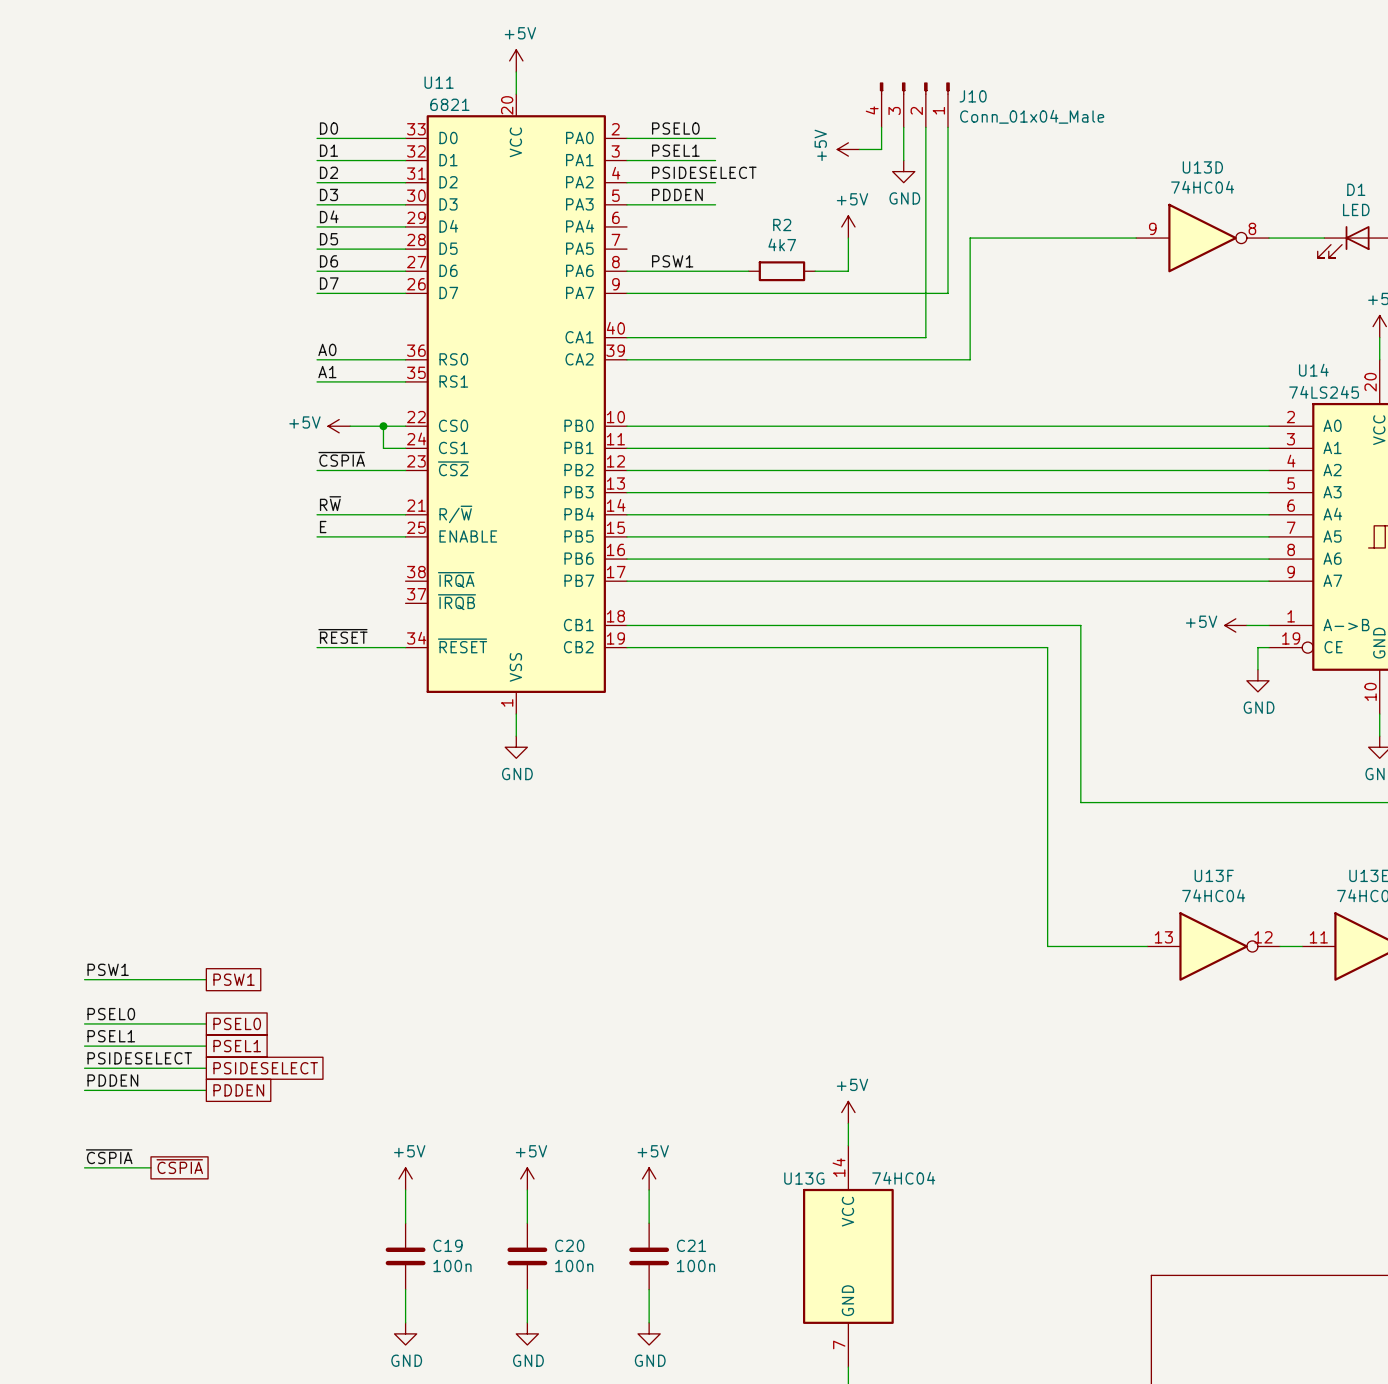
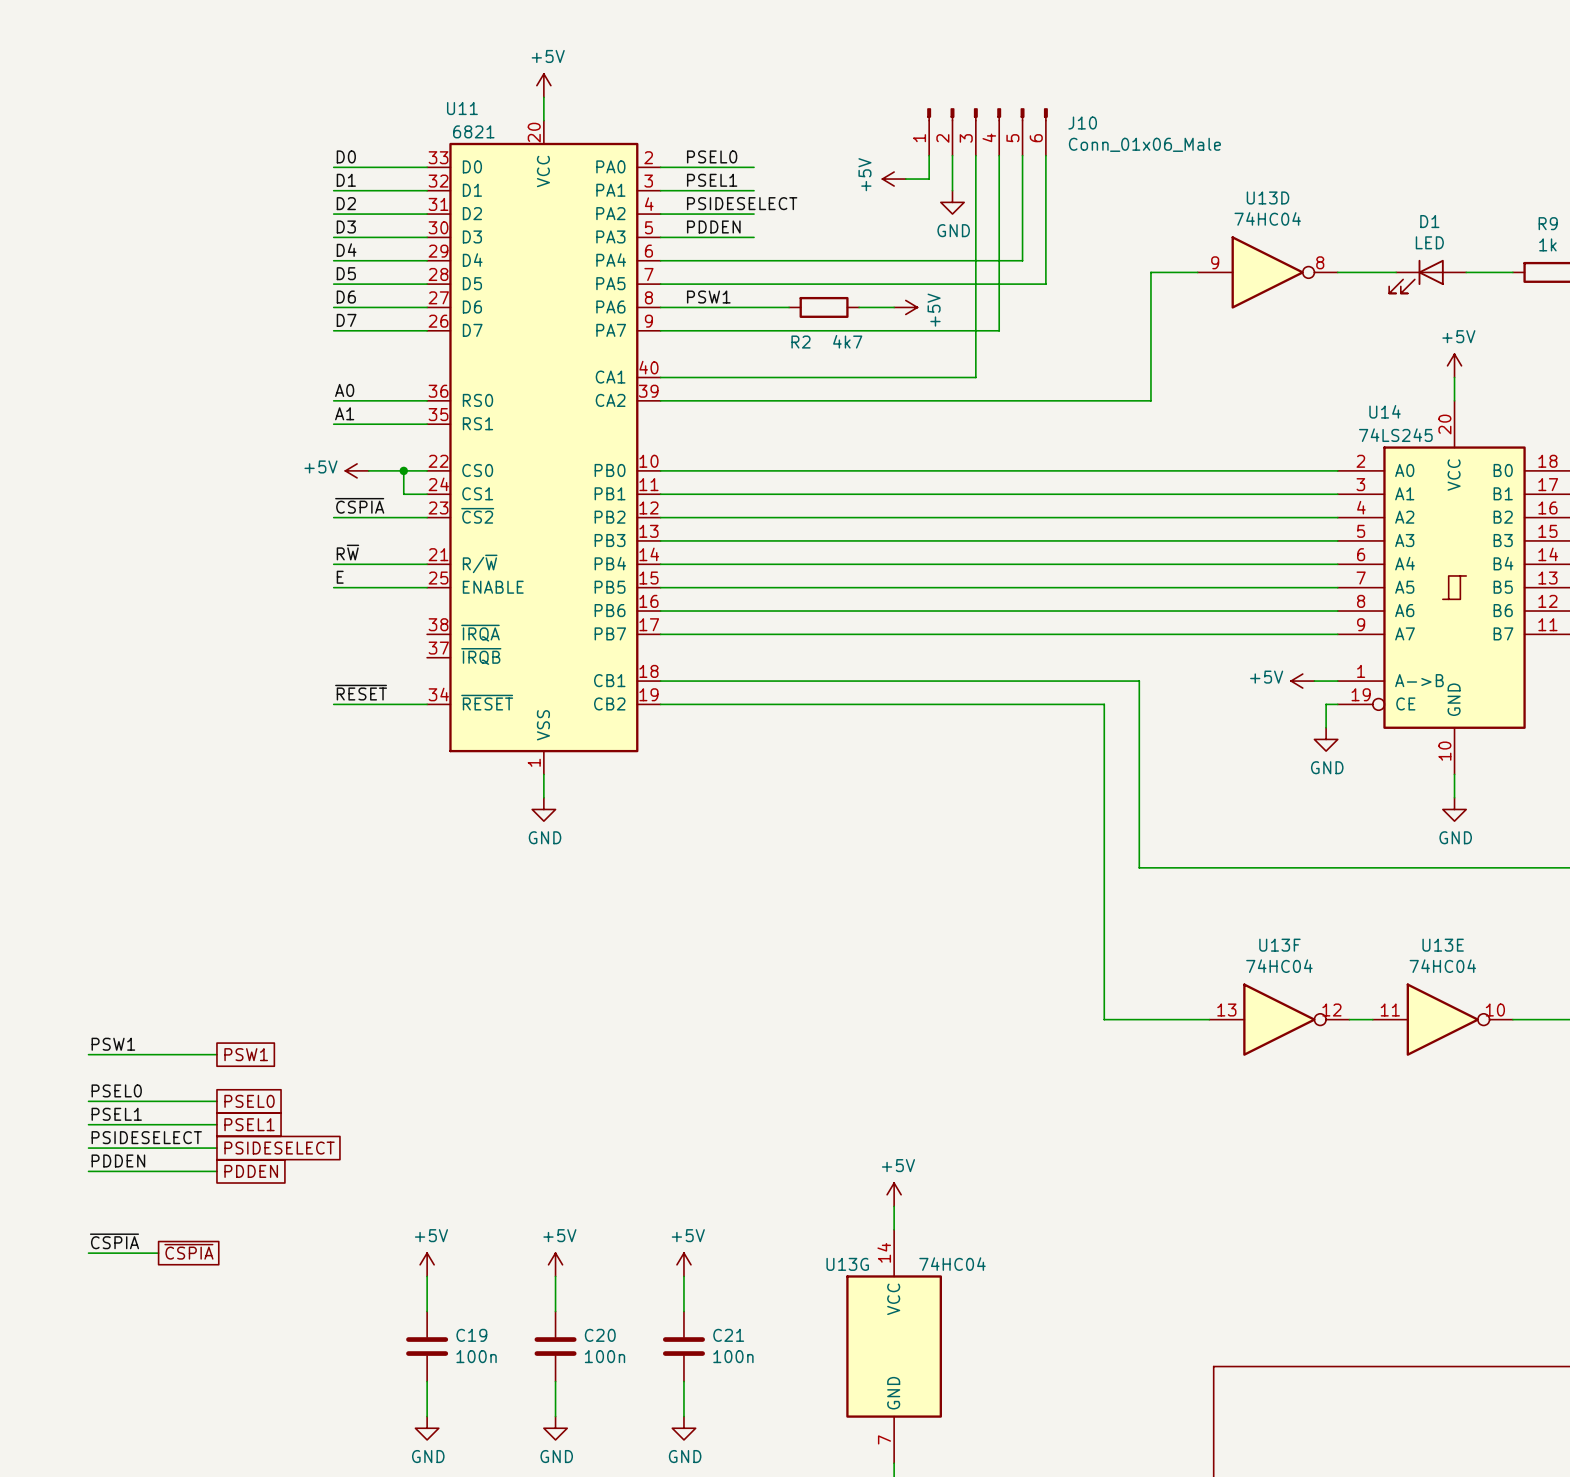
J10 symbol: [879, 82, 950, 128] -> [927, 108, 1048, 156]
J10 name position: J10 (973, 96) -> J10 (1082, 123)
J10 value: Conn_01x04_Male (1032, 116) -> Conn_01x06_Male (1144, 144)
wire: none -> (1022, 155) (1022, 260) (660, 260)
wire: none -> (1045, 155) (1045, 284) (660, 284)
R2 name position: R2 (782, 225) -> R2 (801, 342)
power symbol rotation: 0° (848, 226) -> 90° clockwise (905, 307)
power symbol position: +5V (848, 226) -> +5V (905, 307)
wire: (848, 238) (848, 271) -> none
wire: (1091, 238) (970, 238) (970, 359) -> (1150, 272) (1150, 400) (1022, 400)
R2 value position: 4k7 (782, 244) -> 4k7 (847, 341)

